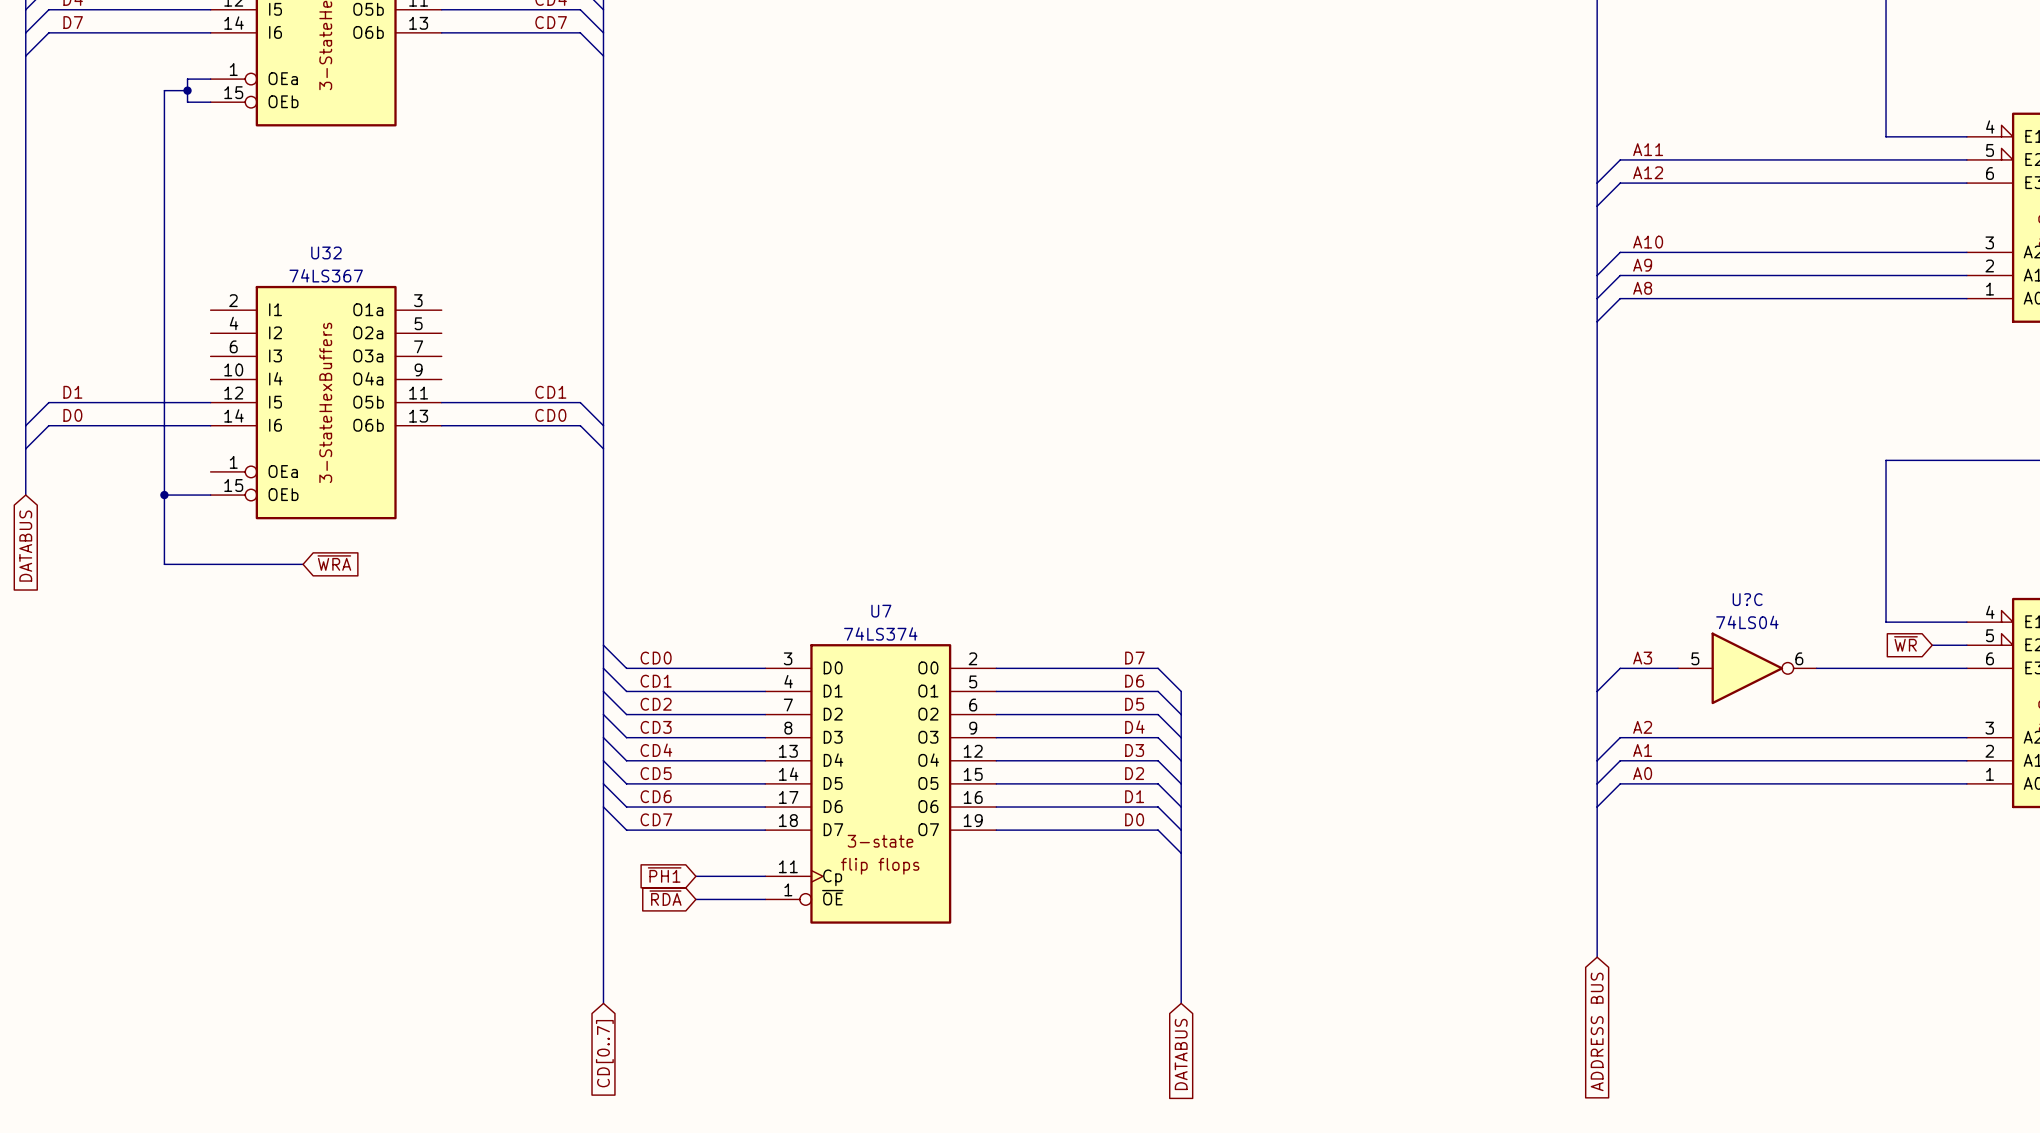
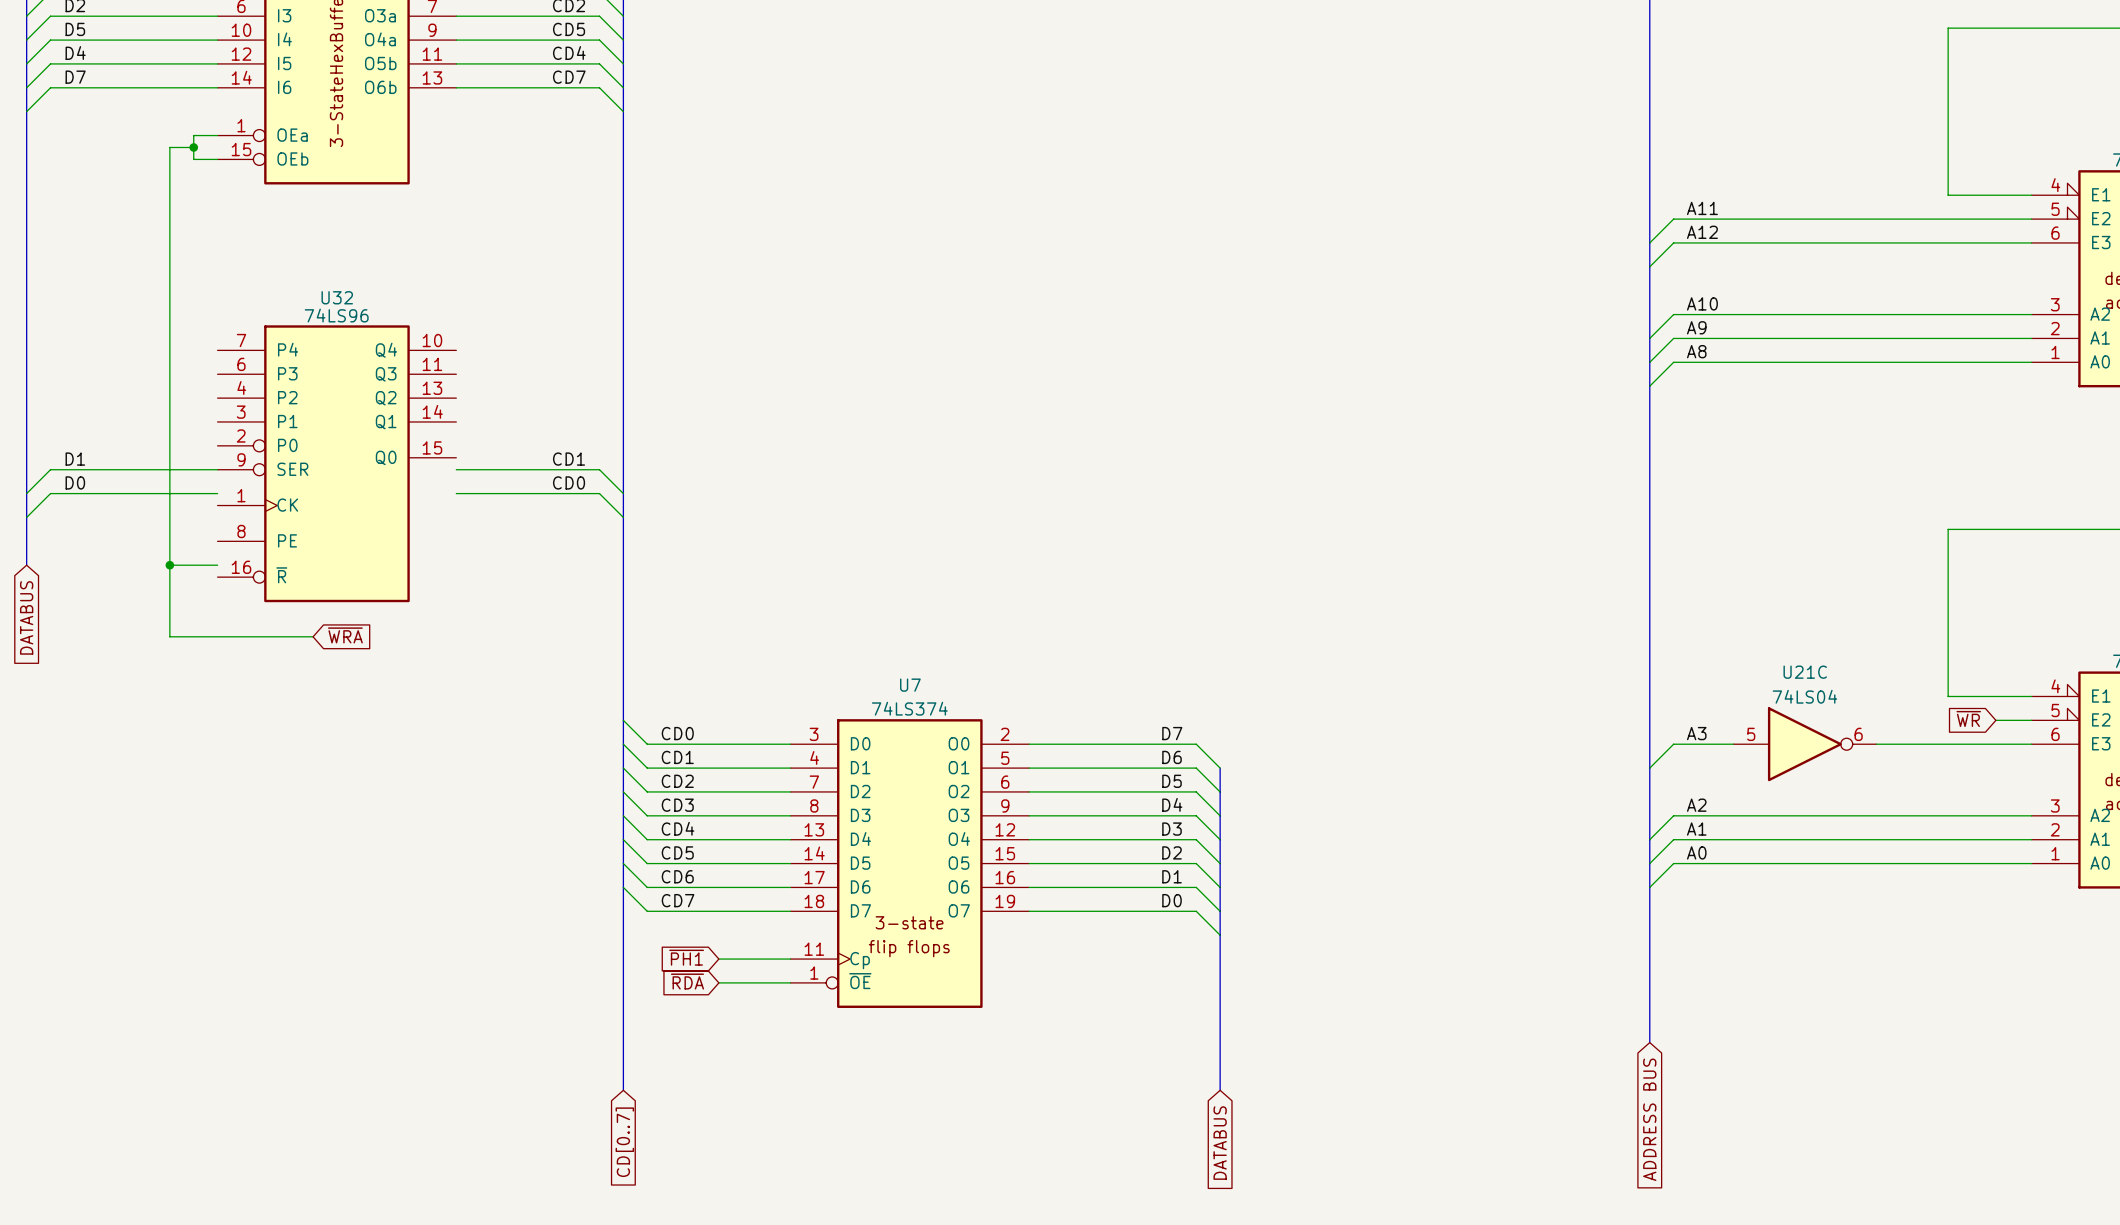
U32 value: 74LS367 (326, 275) -> 74LS96 (336, 315)
U32 symbol: [210, 285, 442, 520] -> [217, 325, 457, 603]
U?C name: U?C (1747, 599) -> U21C (1805, 672)

